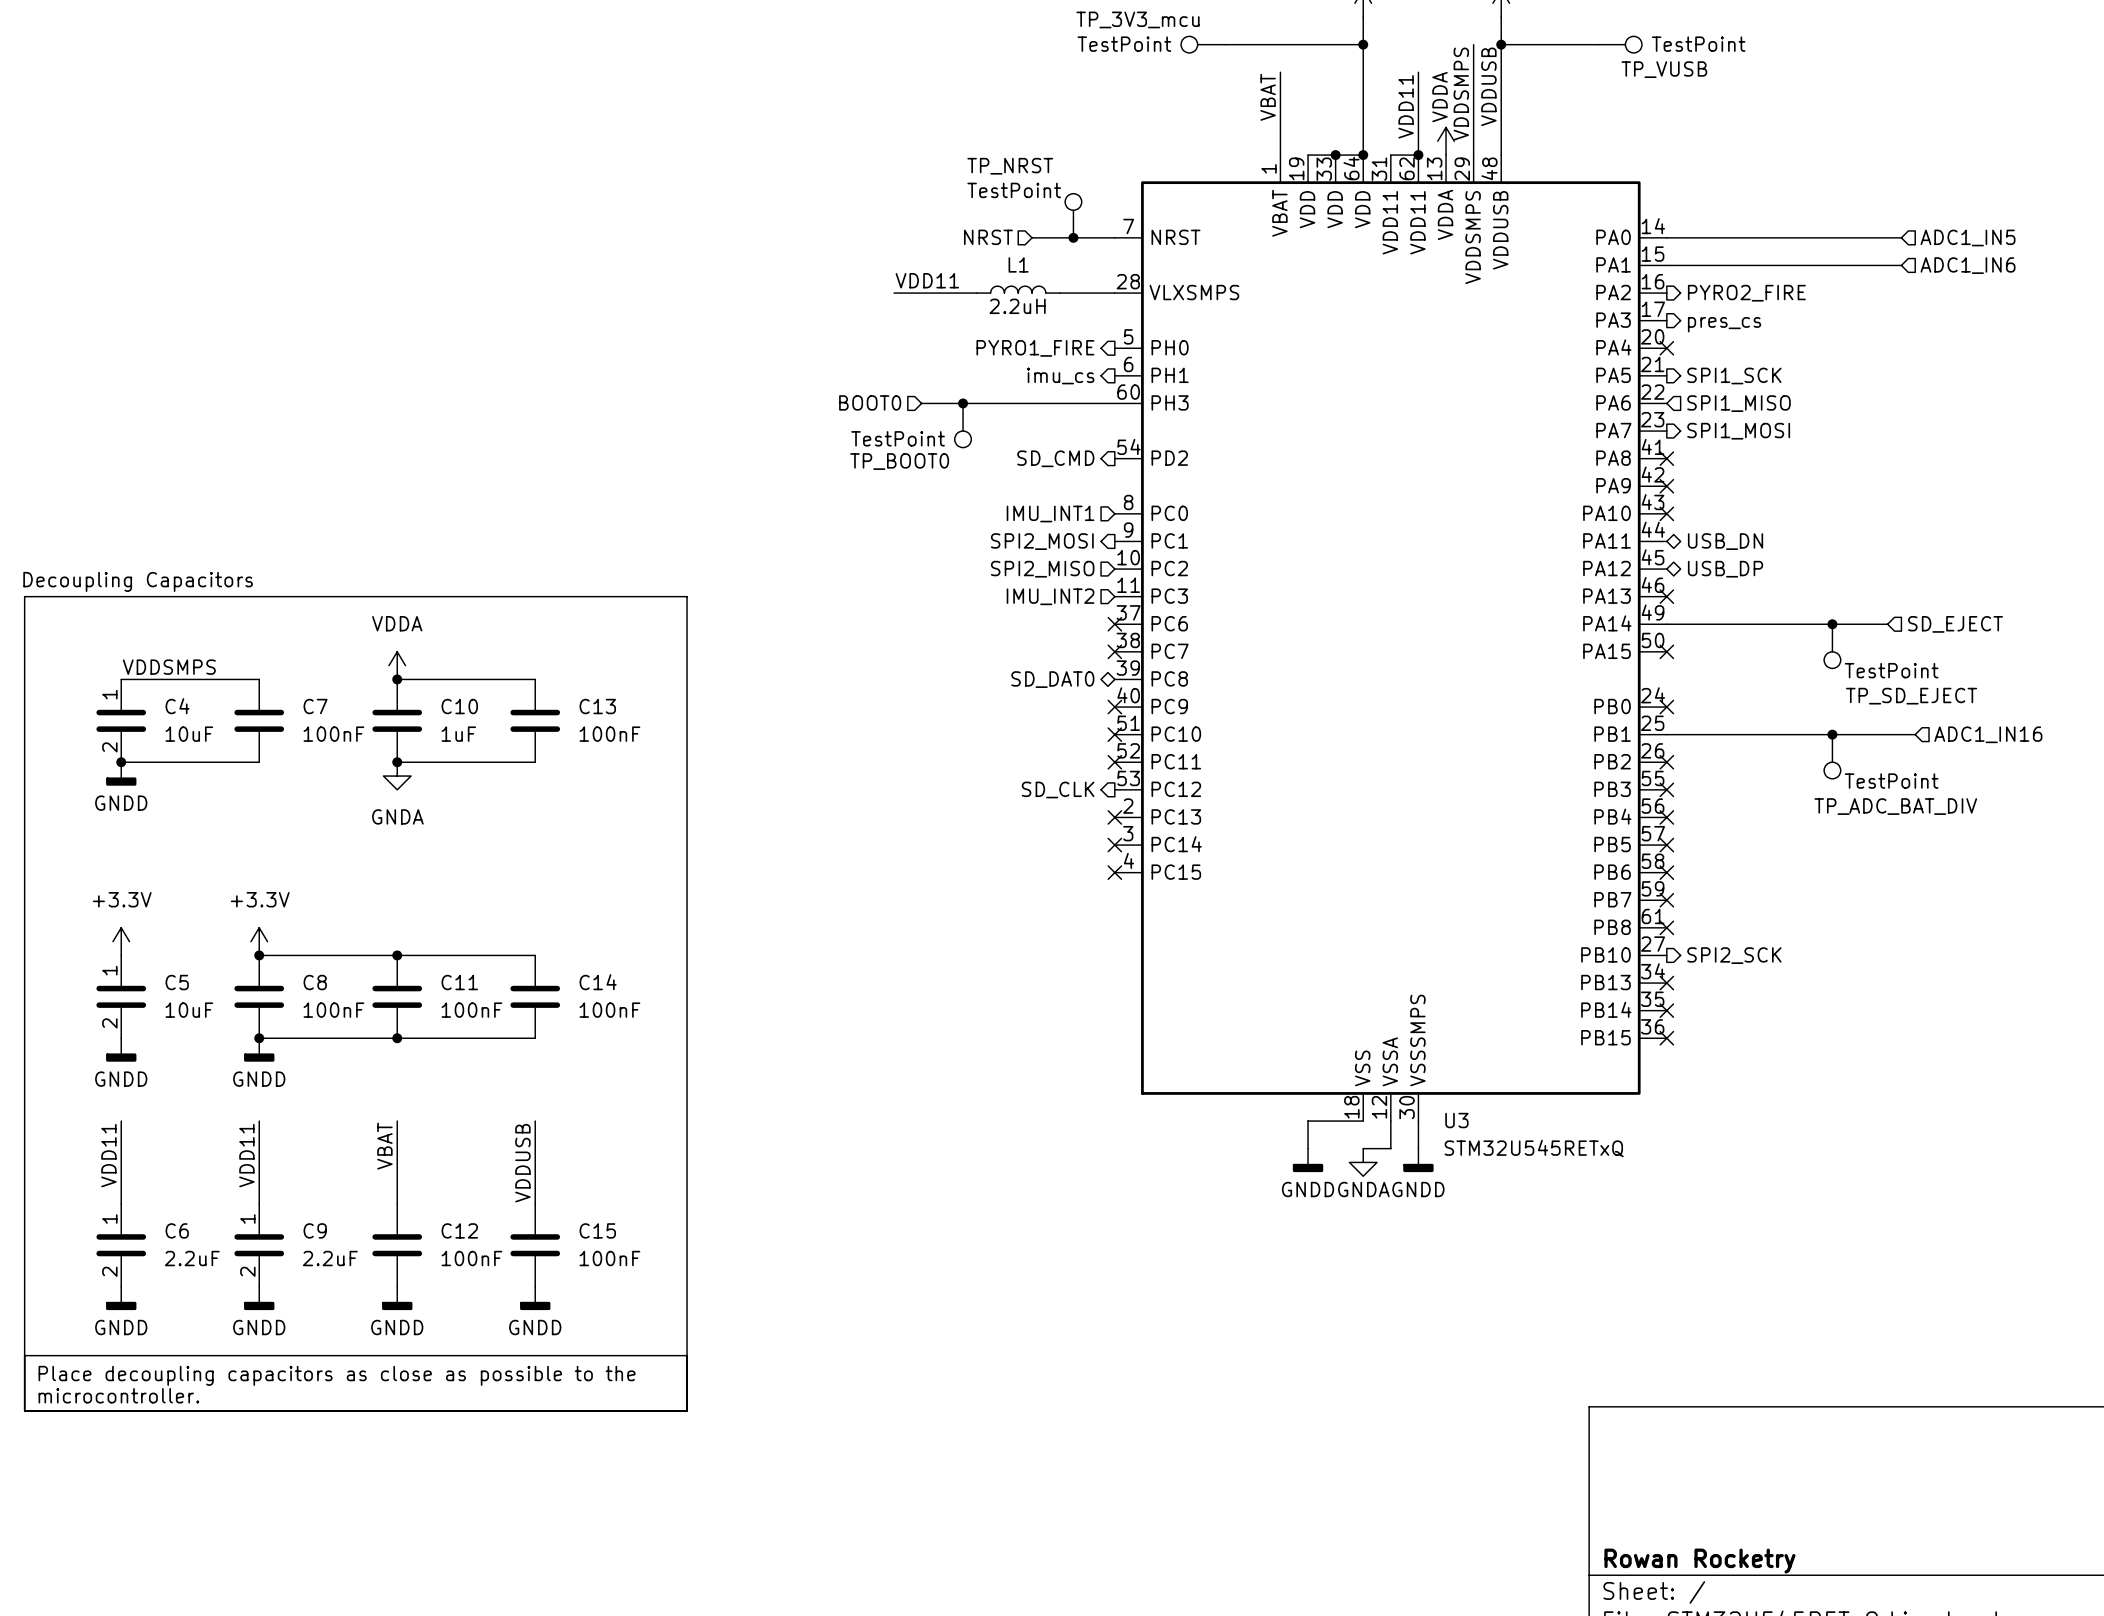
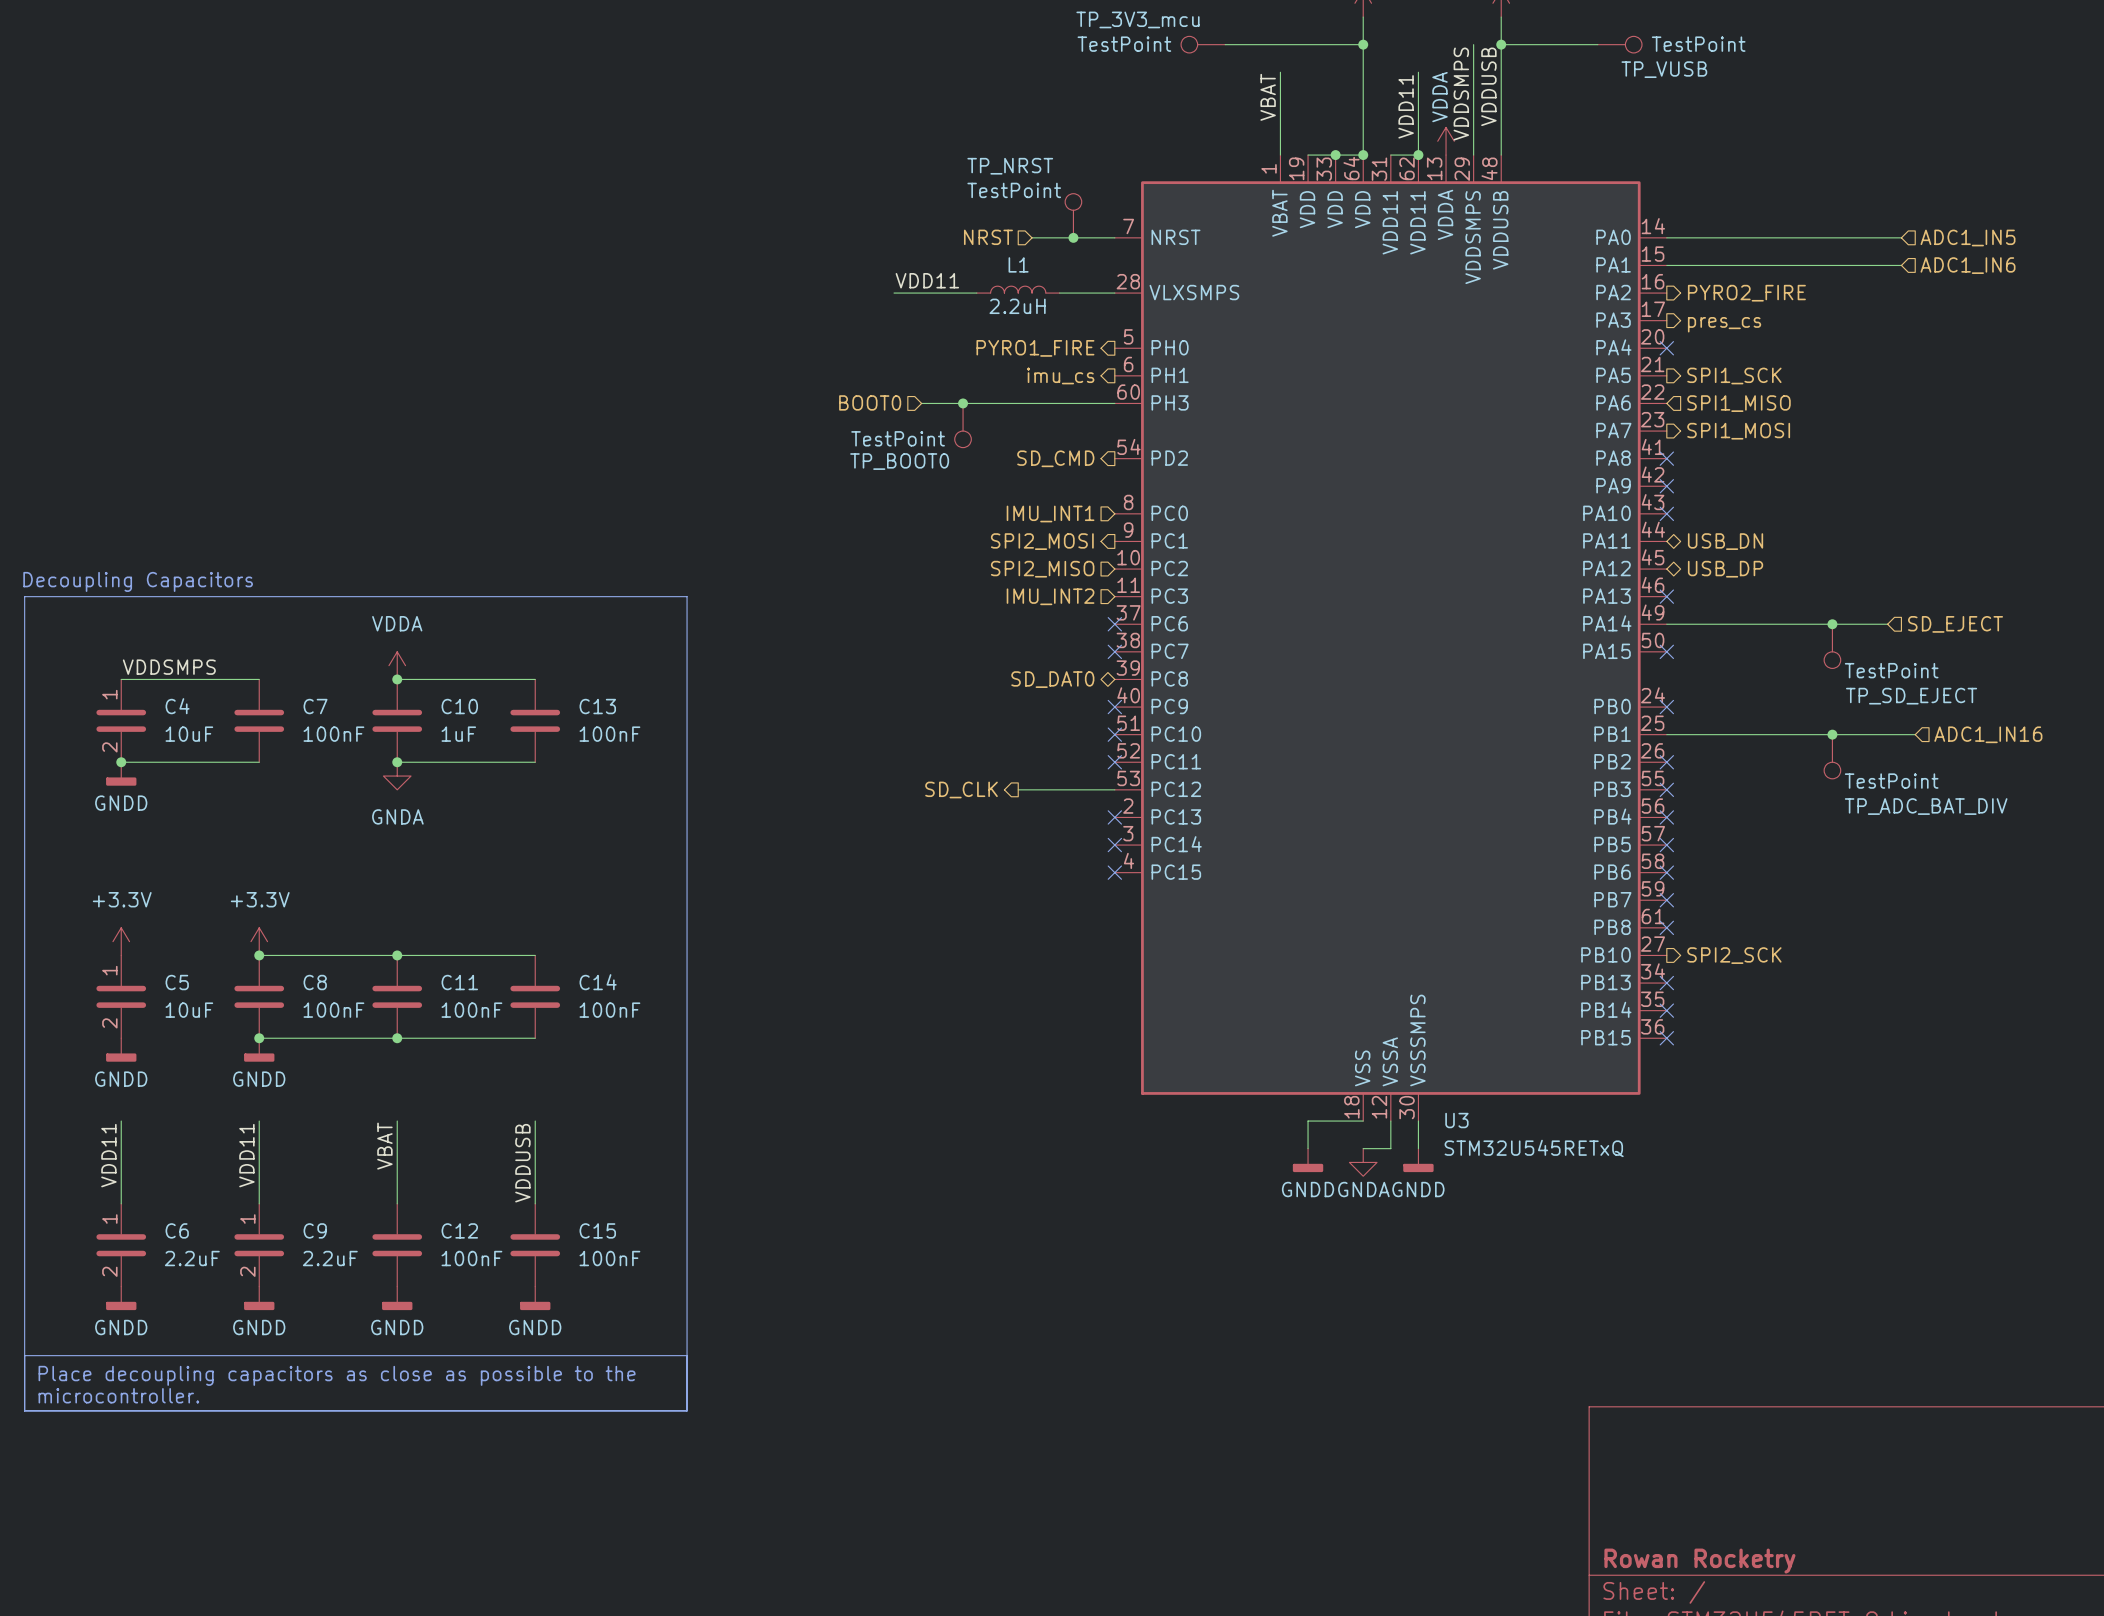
wire: none -> (1018, 789) (1114, 789)
hierarchical label position: SD_CLK (1058, 789) -> SD_CLK (961, 789)
TP_ADC_BAT_DIV name position: TP_ADC_BAT_DIV (1895, 806) -> TP_ADC_BAT_DIV (1926, 806)

